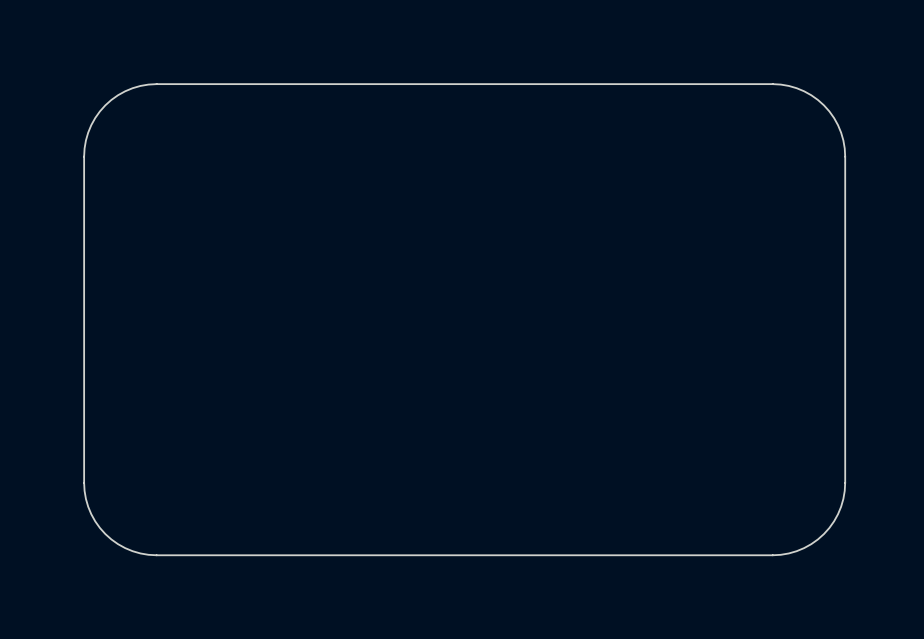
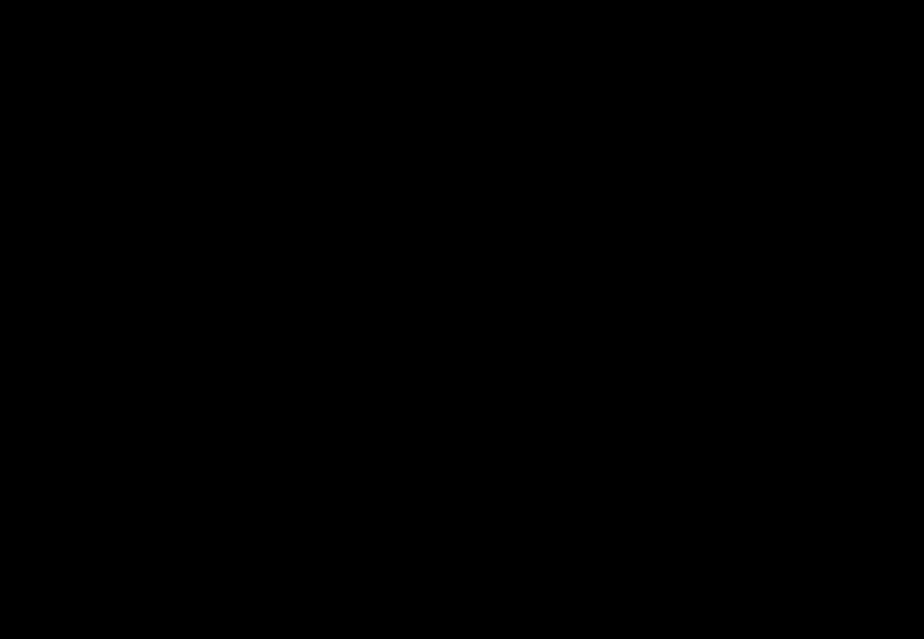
board edge: (772, 84) (156, 84) (140, 85) (118, 95) (105, 105) (95, 118) (88, 132) (84, 156) (84, 482) (88, 506) (95, 521) (105, 534) (125, 548) (140, 553) (156, 555) (772, 555) (796, 551) (811, 544) (823, 534) (834, 521) (841, 506) (844, 490) (844, 148) (838, 125) (823, 105) (804, 91) (788, 85) (772, 84) -> none

